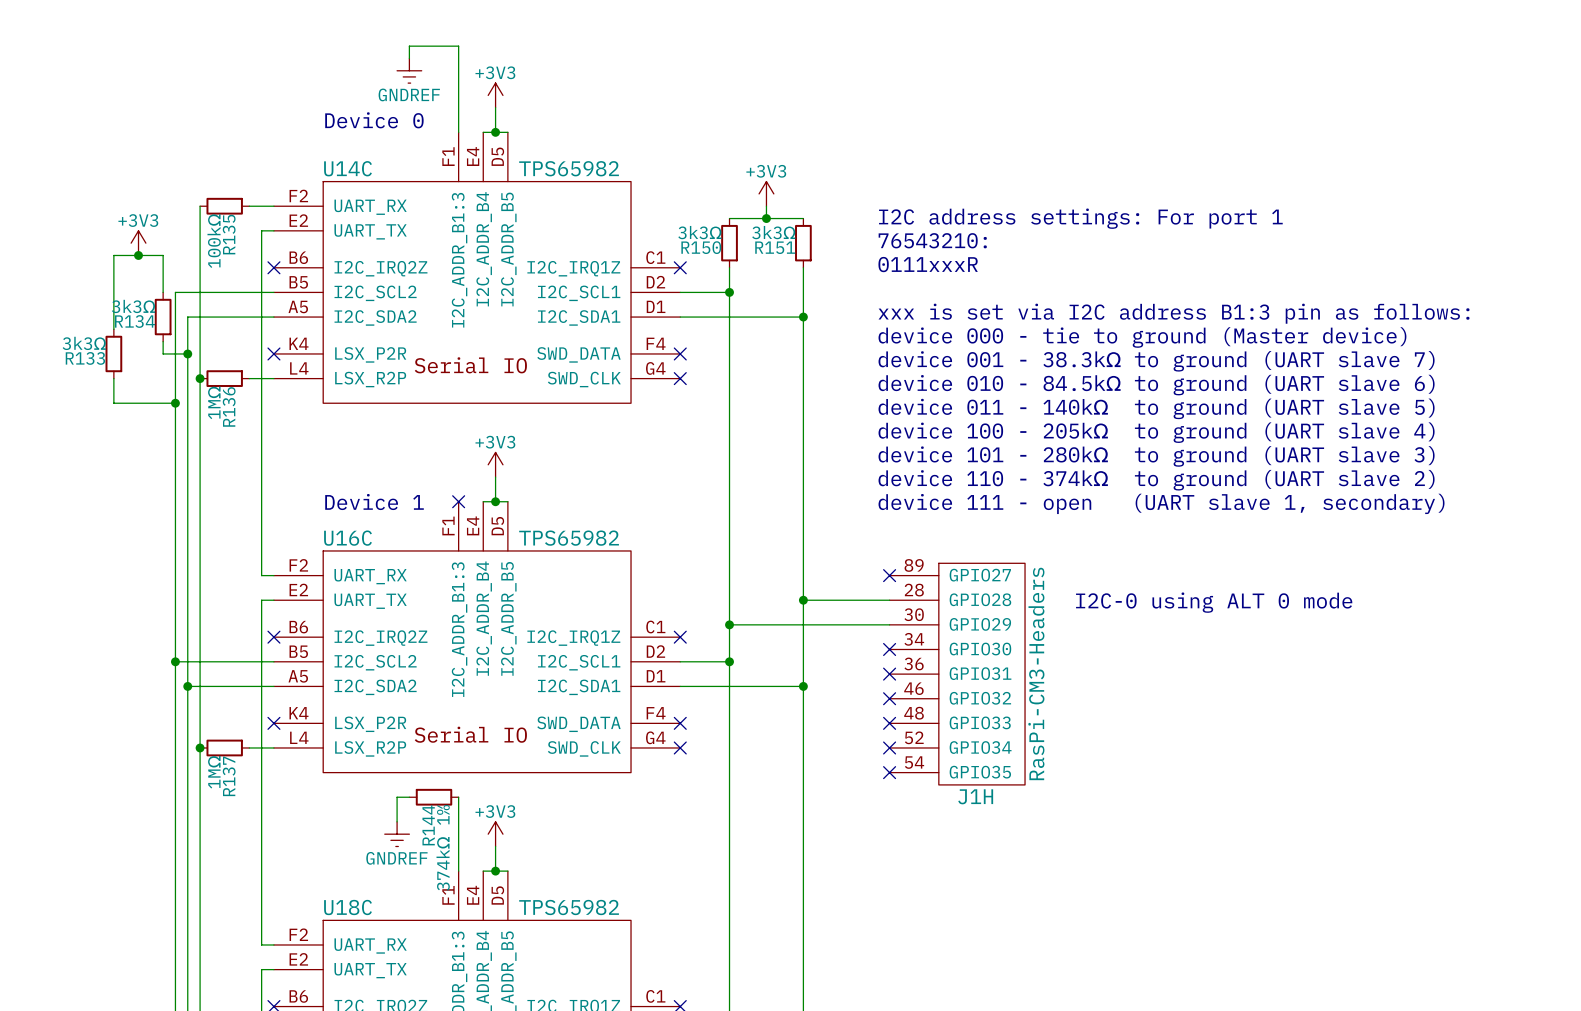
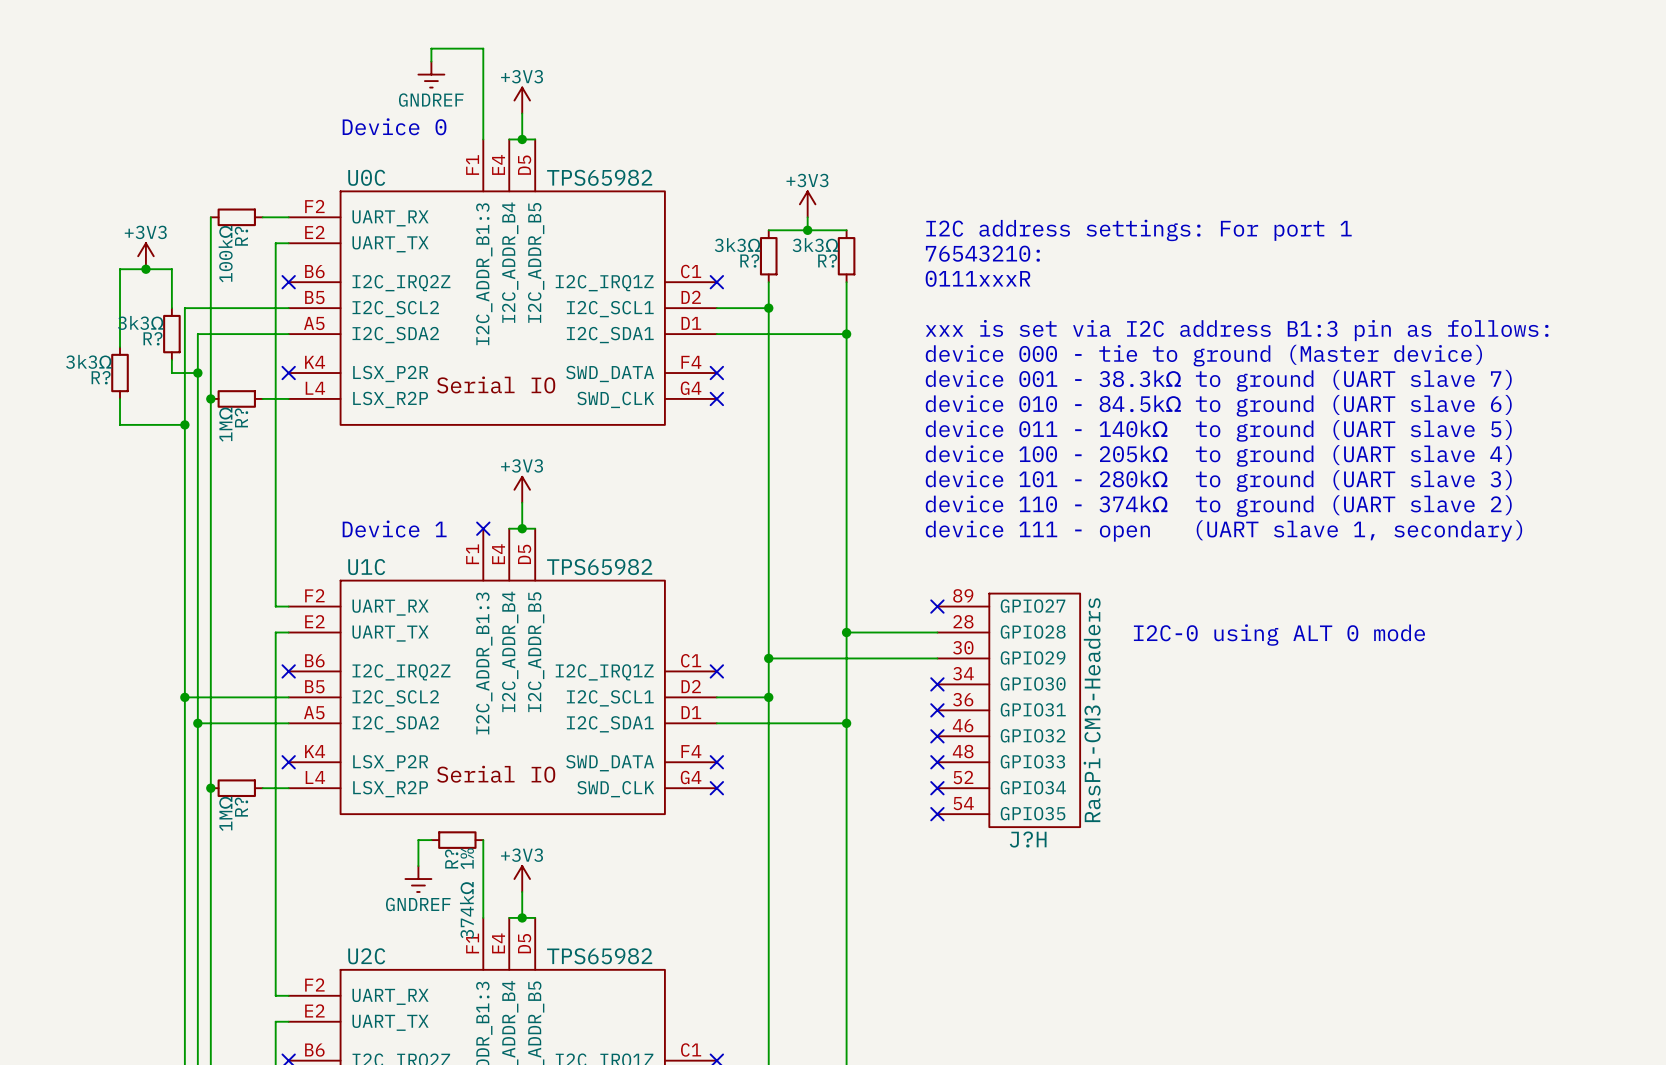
U14C name: U14C (348, 168) -> U0C (366, 177)
R135 name: R135 (229, 234) -> R? (241, 236)
R150 name: R150 (701, 247) -> R? (749, 260)
R151 name: R151 (775, 247) -> R? (827, 260)
R134 name: R134 (135, 321) -> R? (152, 338)
R133 name: R133 (85, 358) -> R? (101, 377)
R136 name: R136 (229, 406) -> R? (241, 417)
U16C name: U16C (348, 538) -> U1C (366, 567)
R137 name: R137 (229, 776) -> R? (241, 807)
J1H name: J1H (975, 796) -> J?H (1028, 839)
R144 name: R144 (428, 825) -> R? (451, 859)
U18C name: U18C (348, 907) -> U2C (366, 956)

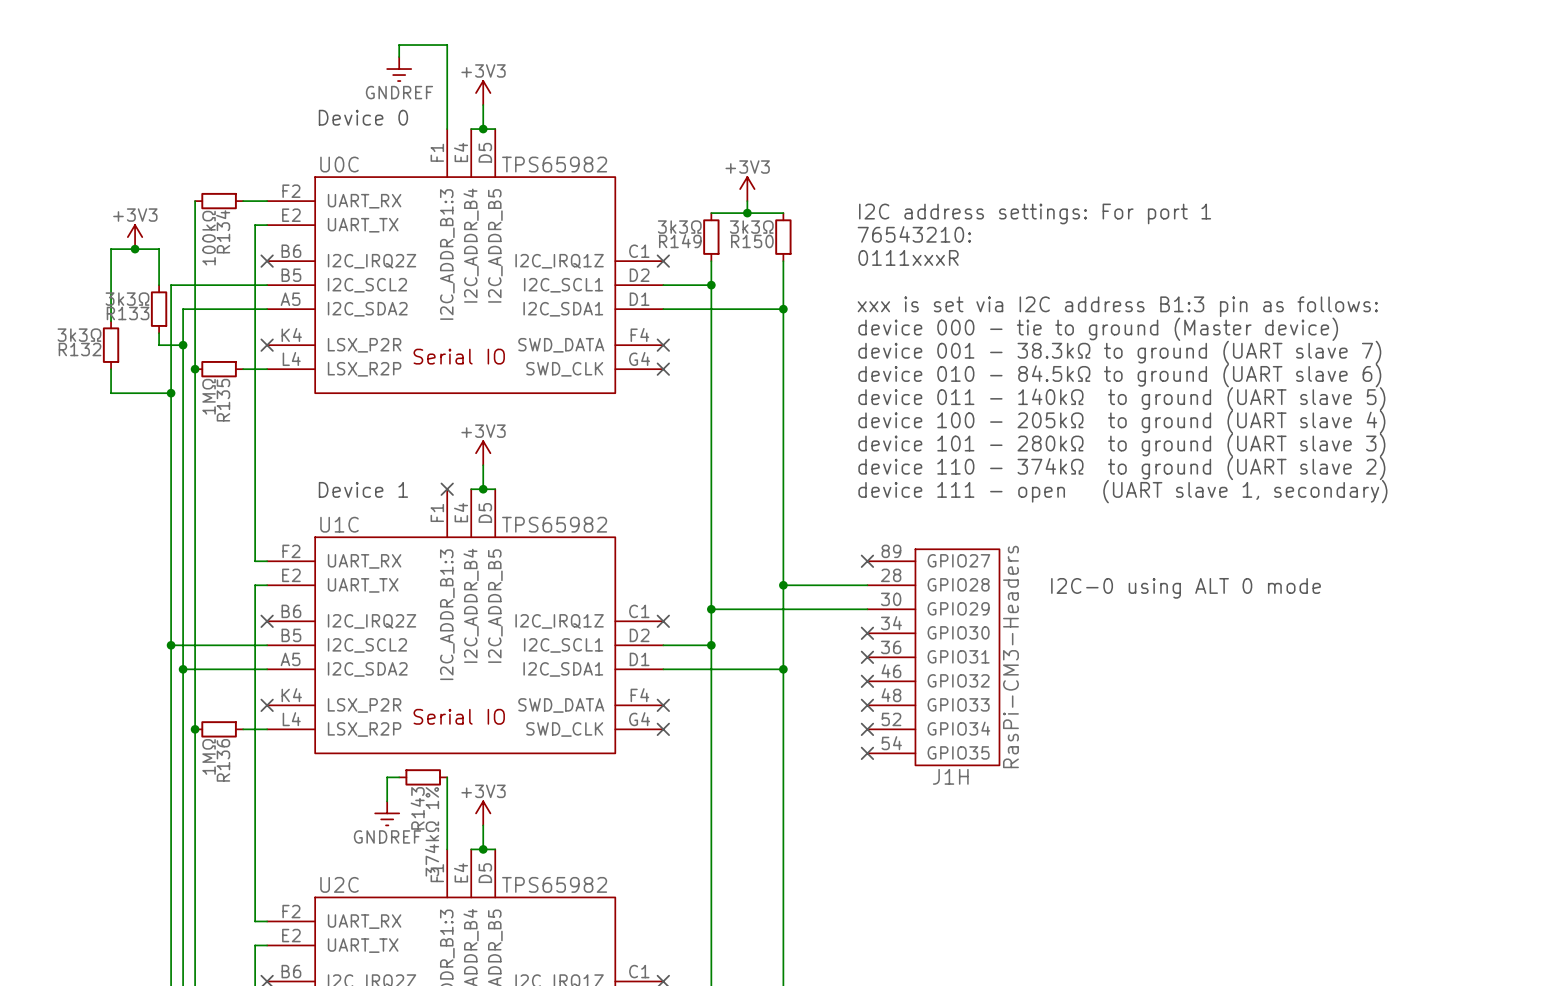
R? name: R? (241, 236) -> R134 (223, 231)
R? name: R? (749, 260) -> R149 (680, 241)
R? name: R? (827, 260) -> R150 (752, 241)
R? name: R? (152, 338) -> R133 (128, 313)
R? name: R? (101, 377) -> R132 (80, 349)
R? name: R? (241, 417) -> R135 (223, 400)
R? name: R? (241, 807) -> R136 (223, 760)
J?H name: J?H (1028, 839) -> J1H (950, 776)
R? name: R? (451, 859) -> R143 (417, 808)

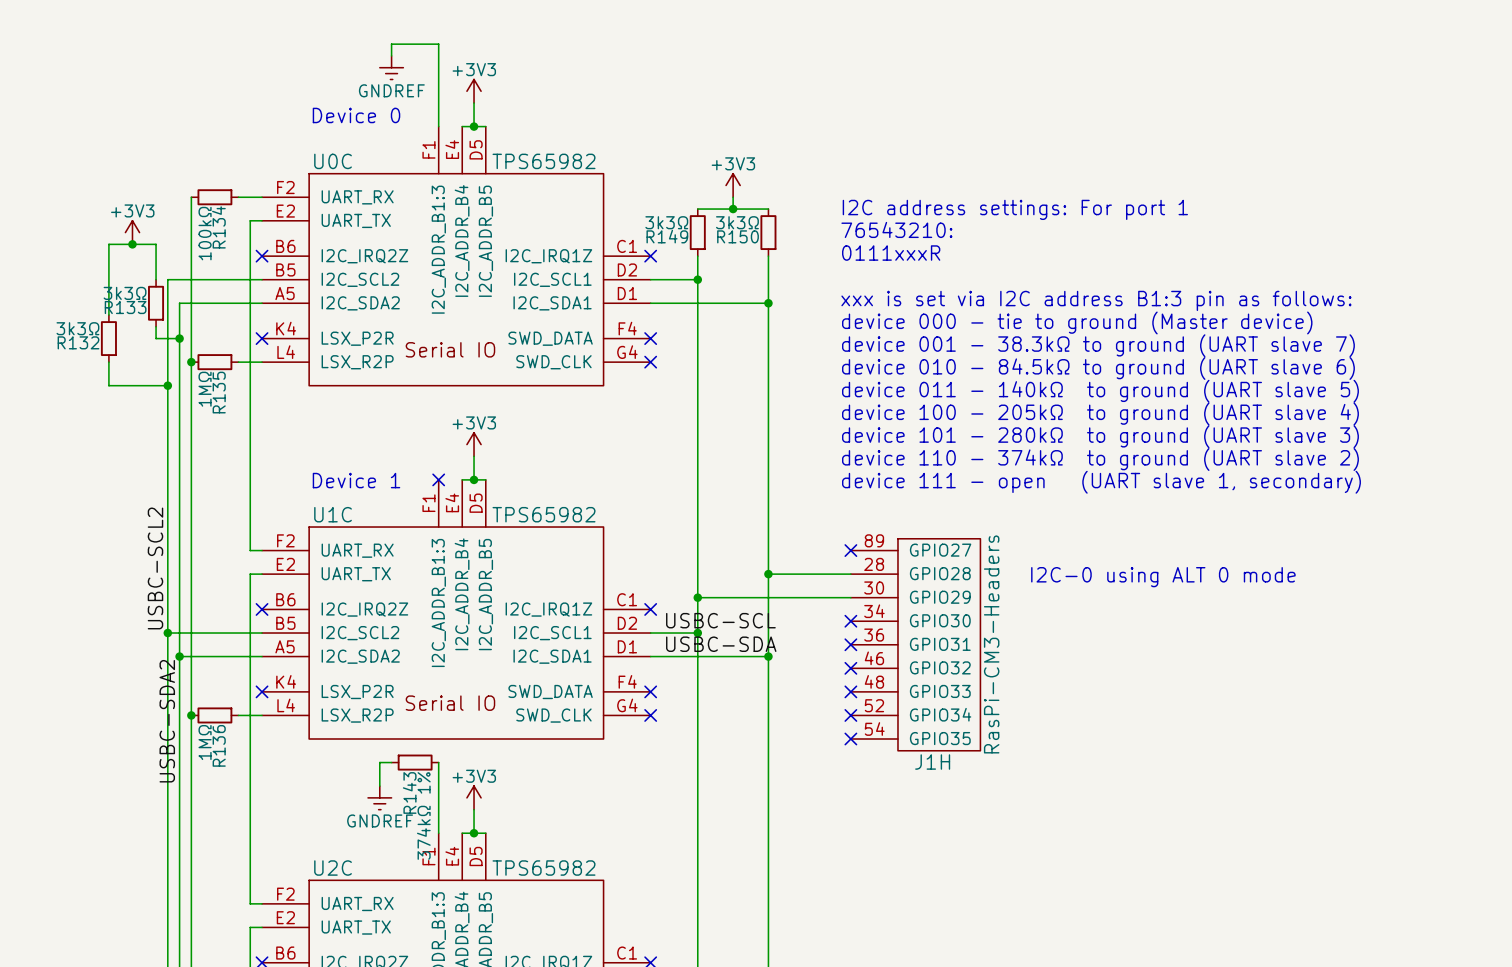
label: none -> USBC-SCL2 (155, 568)
label: none -> USBC-SCL (720, 620)
label: none -> USBC-SDA (721, 644)
label: none -> USBC-SDA2 (167, 721)

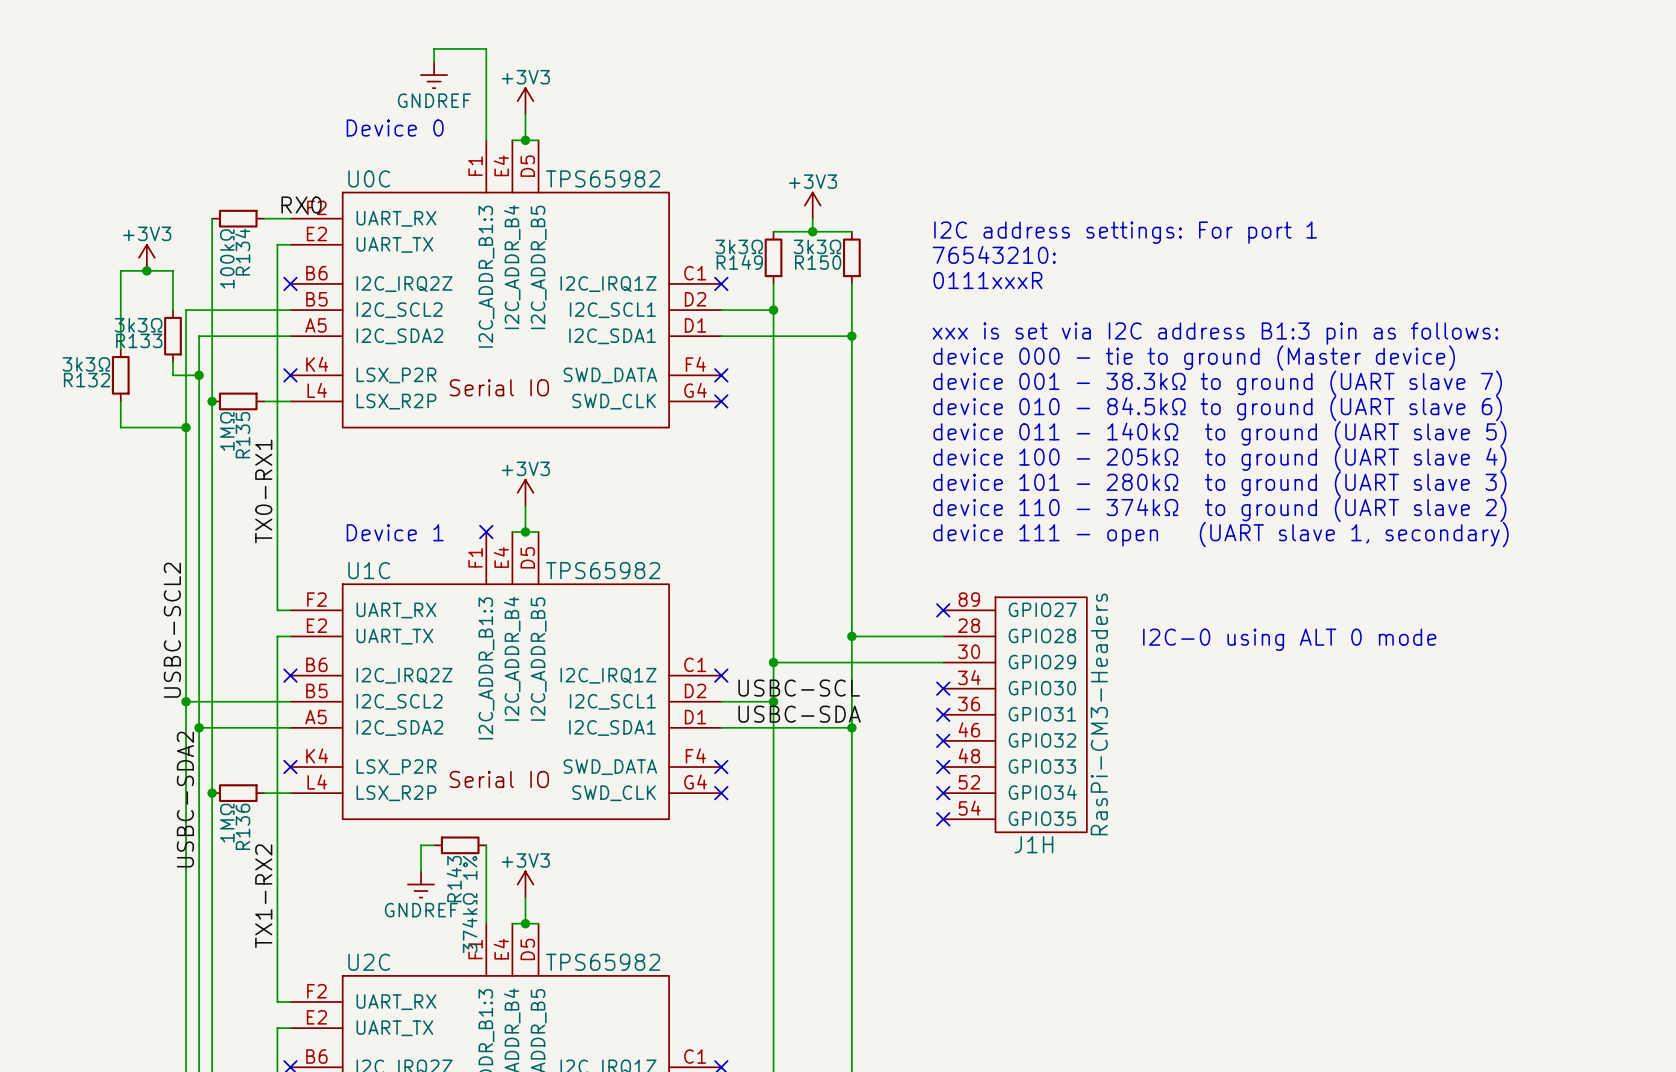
label: none -> RX0 (301, 205)
label: none -> TX0-RX1 (263, 491)
label: none -> TX1-RX2 (263, 896)

